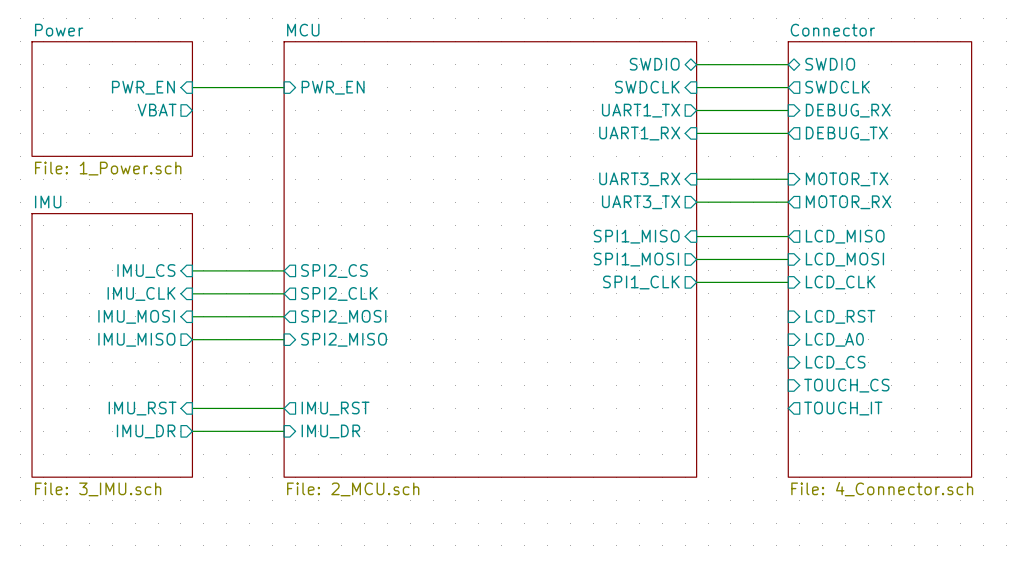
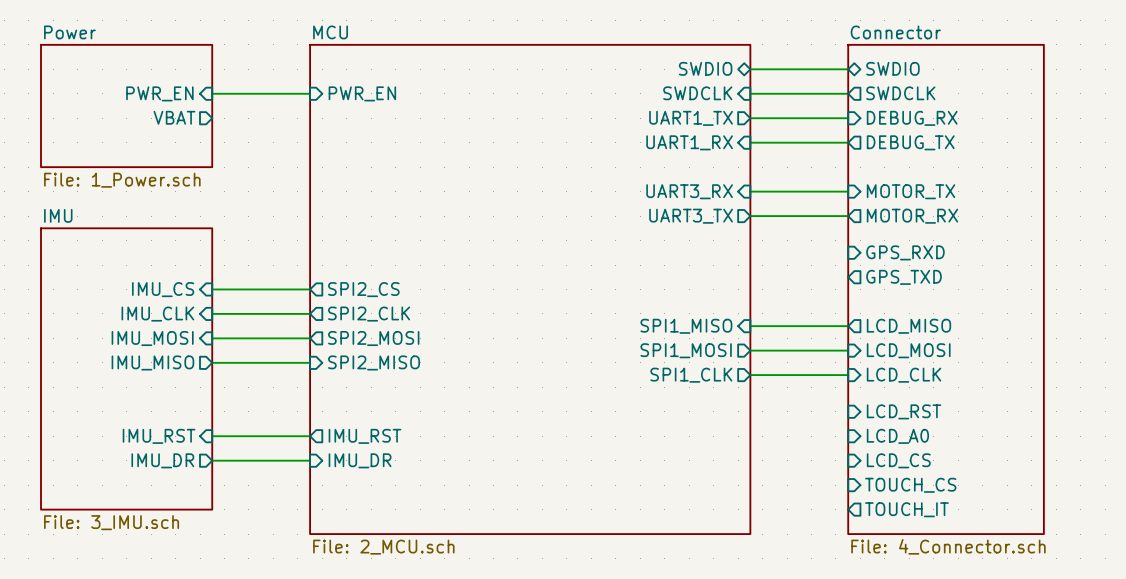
sheet pin position: SPI1_MISO (636, 236) -> SPI1_MISO (686, 326)
wire: (696, 236) (788, 236) -> (750, 326) (848, 326)
sheet pin shape: output (845, 236) -> input (905, 252)
sheet pin: LCD_MISO (845, 236) -> GPS_RXD (905, 252)
sheet MCU: File: 2_MCU.sch (490, 259) -> none
sheet pin position: SPI1_MOSI (636, 259) -> SPI1_MOSI (686, 350)
wire: (696, 259) (788, 259) -> (750, 350) (848, 350)
sheet pin shape: input (844, 259) -> output (904, 277)
sheet pin: LCD_MOSI (844, 259) -> GPS_TXD (904, 277)
sheet Connector: File: 4_Connector.sch (879, 259) -> none
sheet MCU: none -> File: 2_MCU.sch (530, 289)
sheet Connector: none -> File: 4_Connector.sch (946, 289)
sheet pin position: SPI1_CLK (641, 282) -> SPI1_CLK (691, 375)
wire: (696, 282) (788, 282) -> (750, 375) (848, 375)
sheet pin position: LCD_CLK (840, 282) -> LCD_CLK (904, 375)
sheet pin: none -> LCD_MISO (908, 326)
sheet pin: LCD_RST (840, 316) -> none
sheet pin: none -> LCD_MOSI (908, 350)
sheet pin: LCD_A0 (834, 339) -> none
sheet pin position: LCD_CS (835, 362) -> LCD_CS (898, 460)
sheet pin: TOUCH_CS (846, 385) -> LCD_RST (904, 411)
sheet pin shape: output (843, 408) -> input (897, 436)
sheet pin: TOUCH_IT (843, 408) -> LCD_A0 (897, 436)
sheet pin: none -> TOUCH_CS (910, 485)
sheet pin: none -> TOUCH_IT (906, 509)

